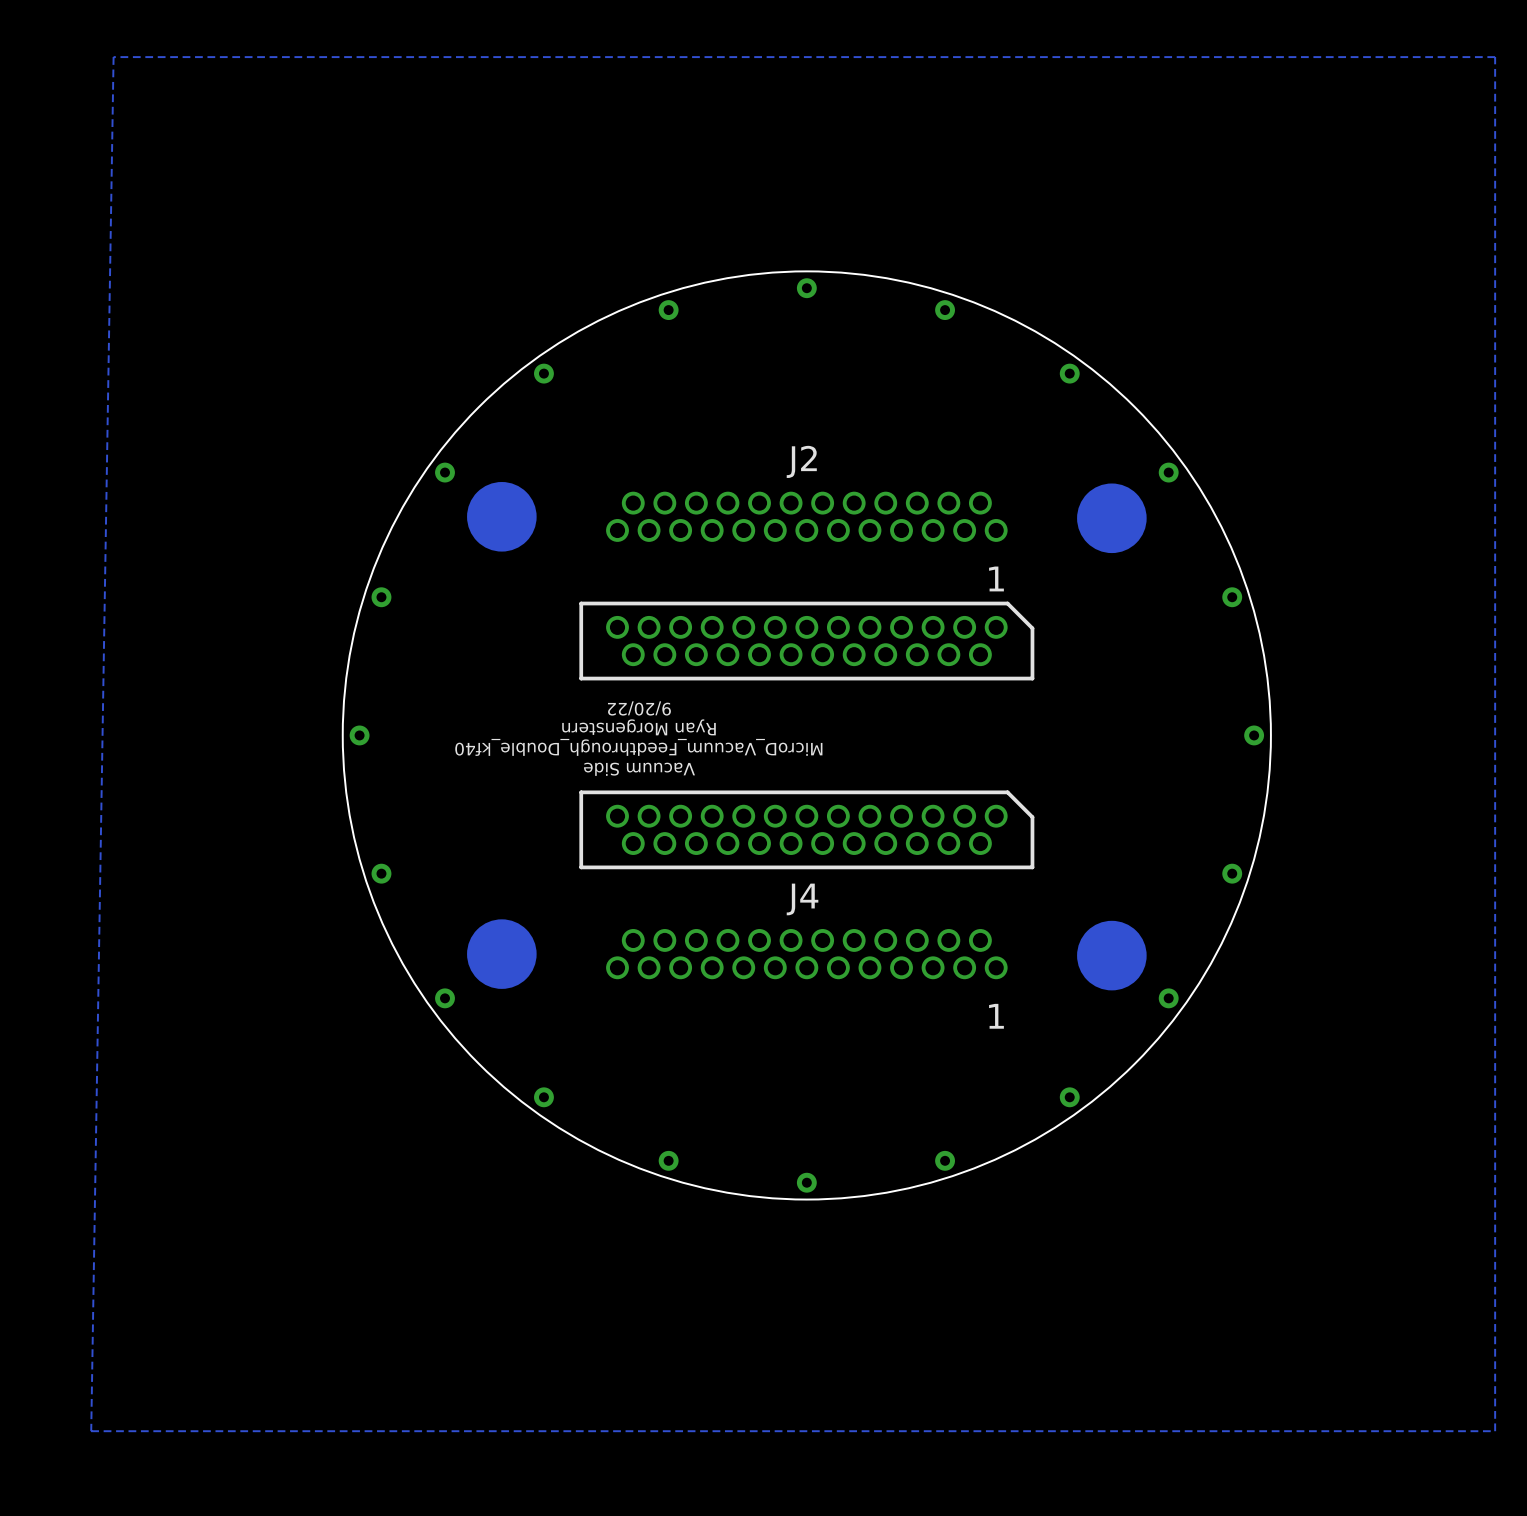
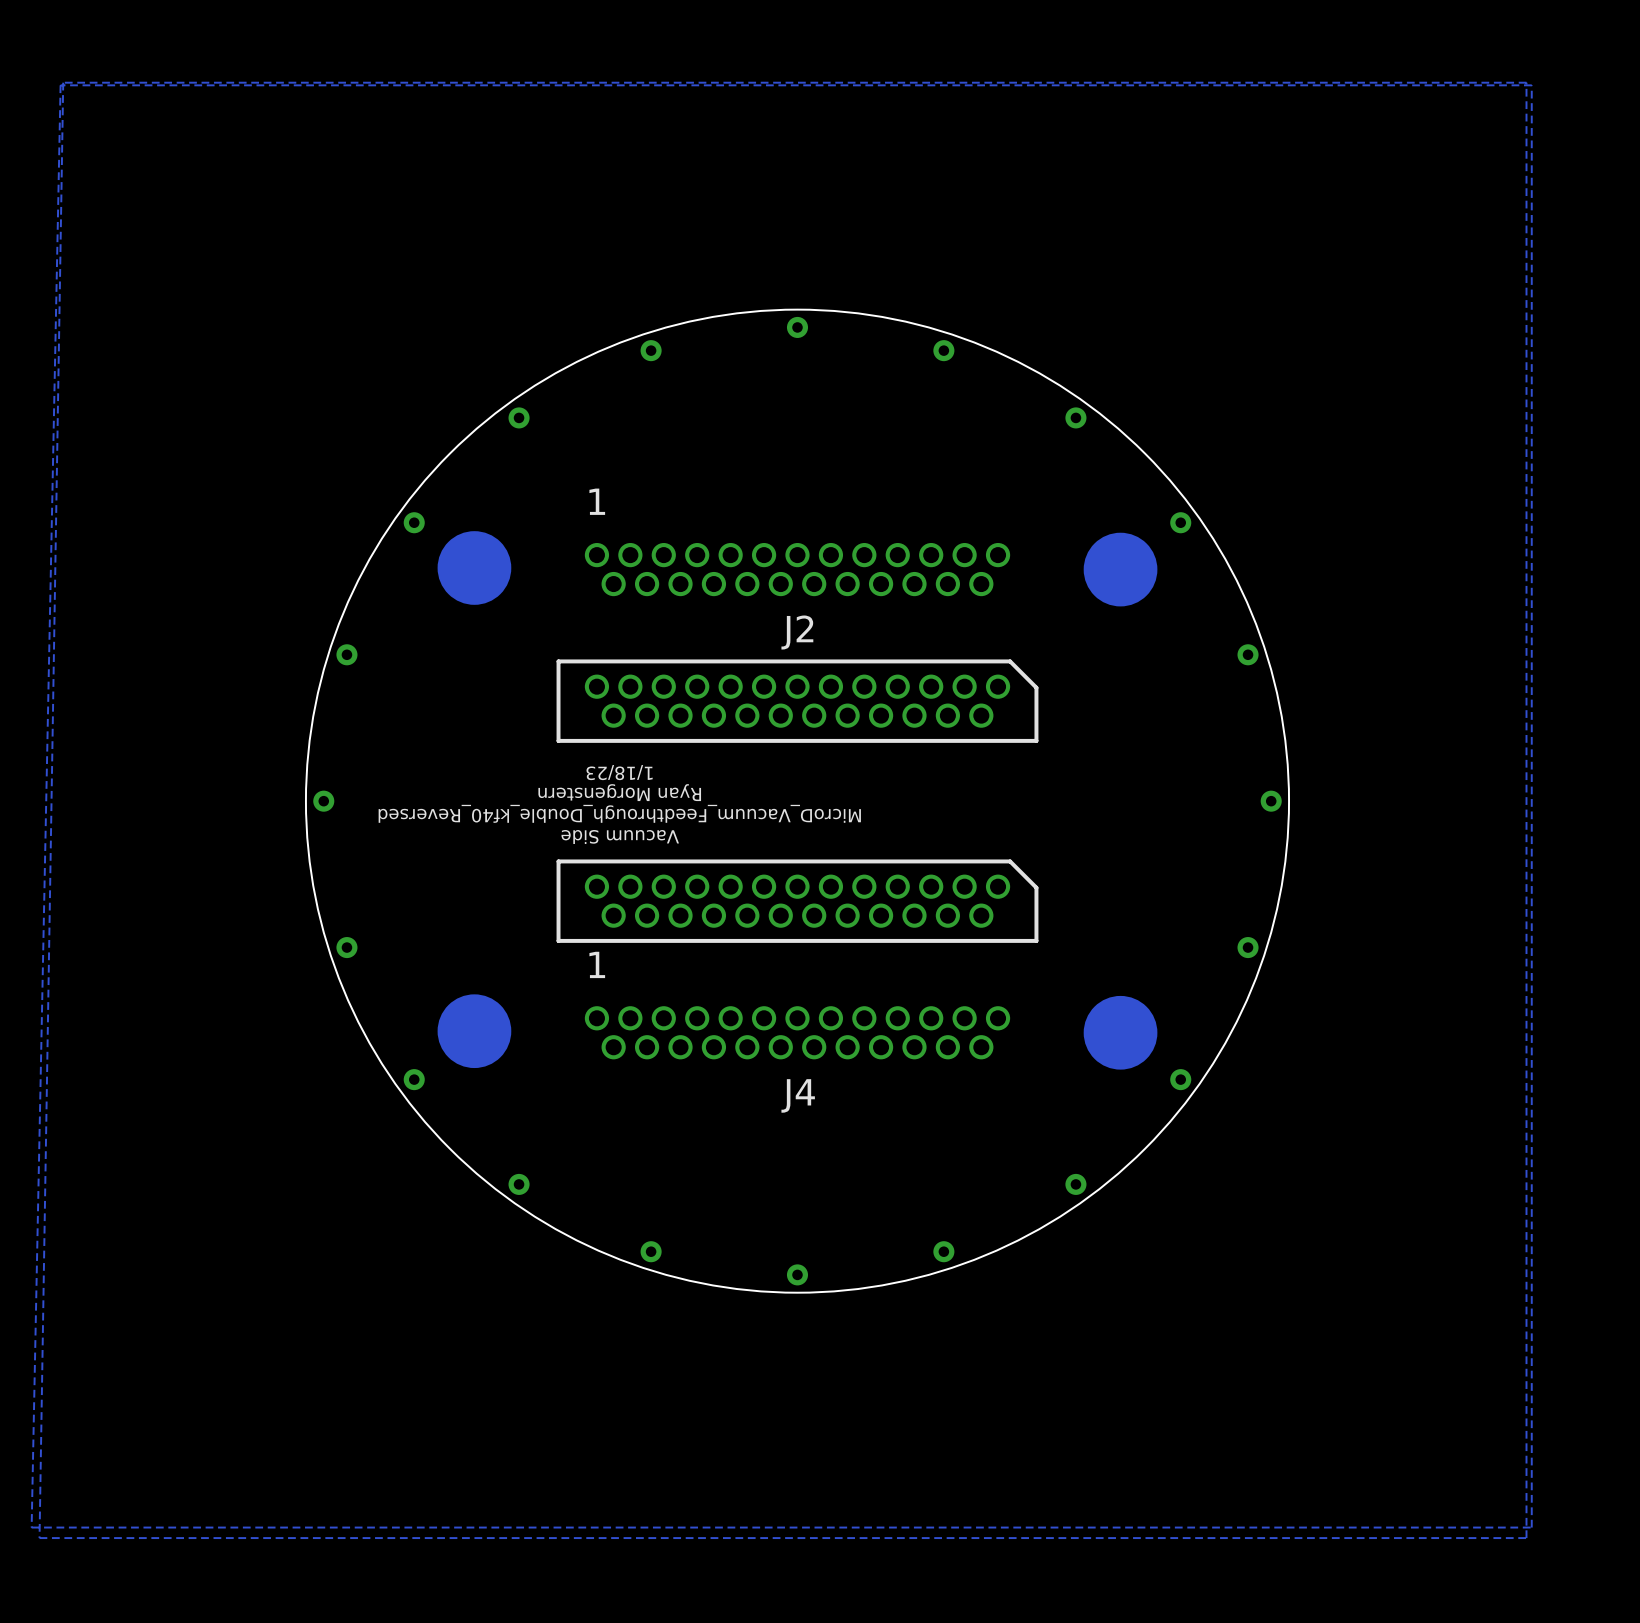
zone outline: none -> (1531, 85) (1531, 1527) (31, 1527) (60, 85) (1531, 85)
J2 rotation: 0° (806, 517) -> 180° (797, 568)
text: 9/20/22 (639, 708) -> 1/18/23 (619, 772)
text: MicroD_Vacuum_Feedthrough_Double_kf40 (638, 747) -> MicroD_Vacuum_Feedthrough_Double_kf40_Reversed (619, 813)
J4 rotation: 0° (806, 954) -> 180° (797, 1031)

